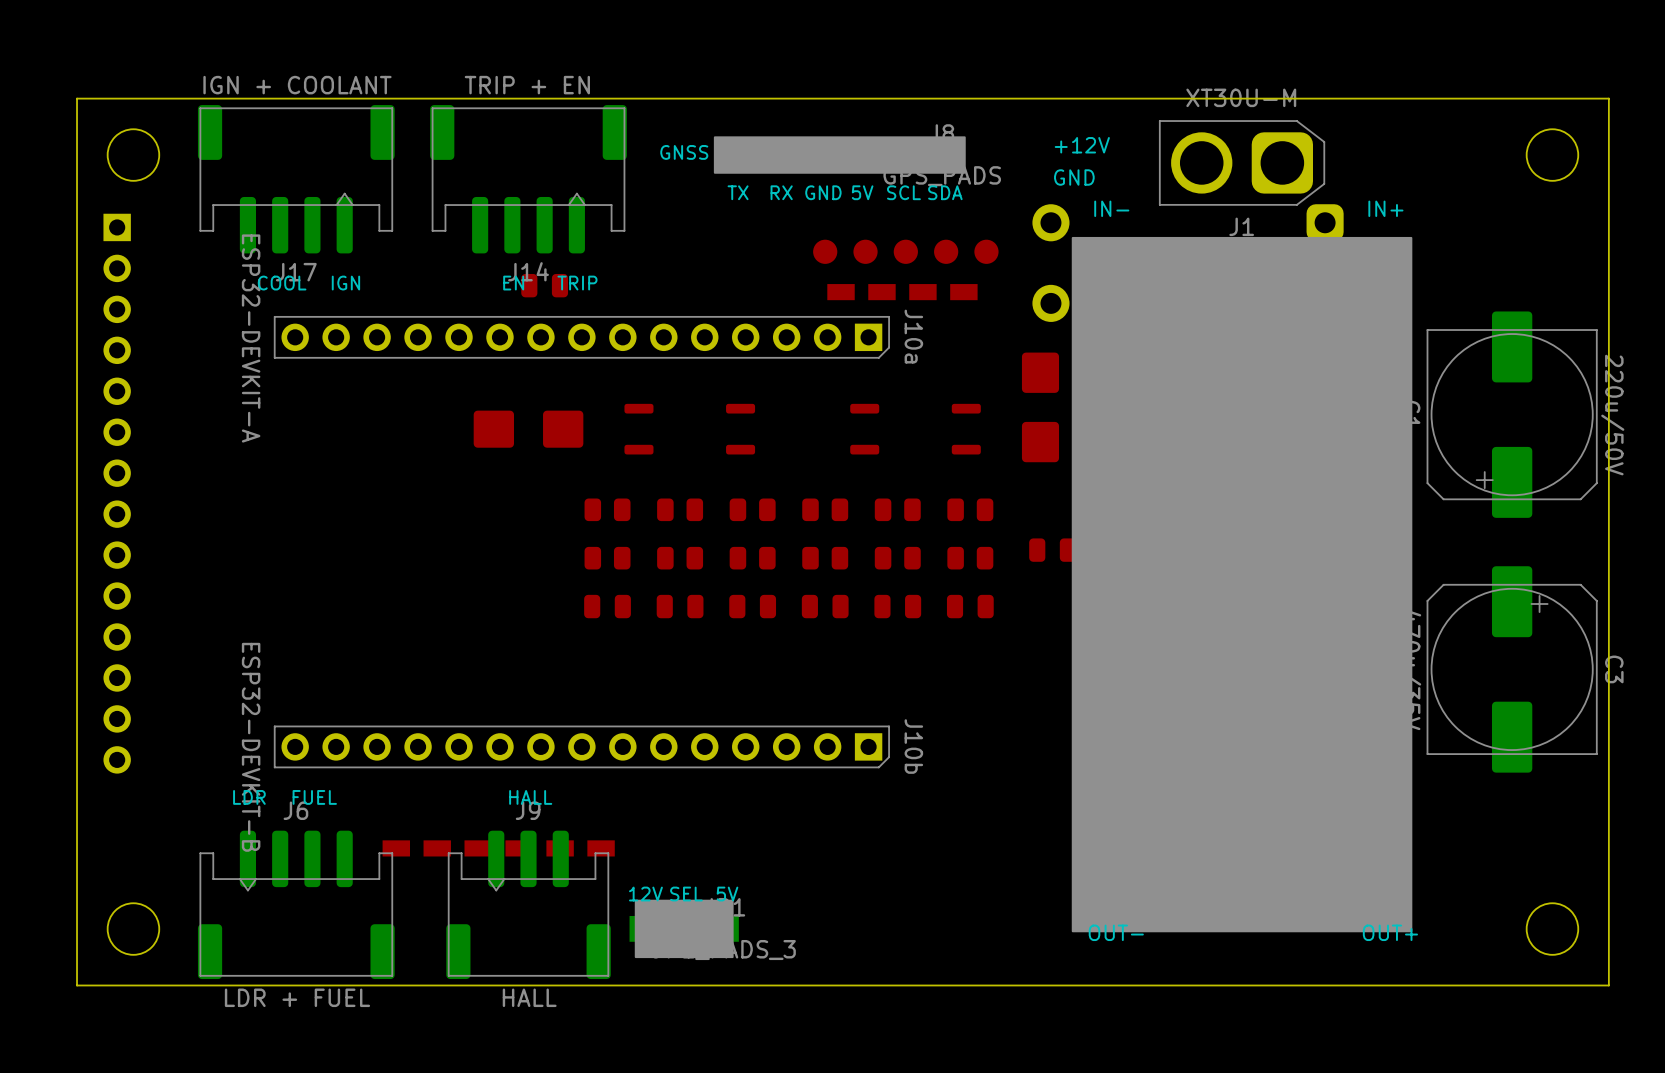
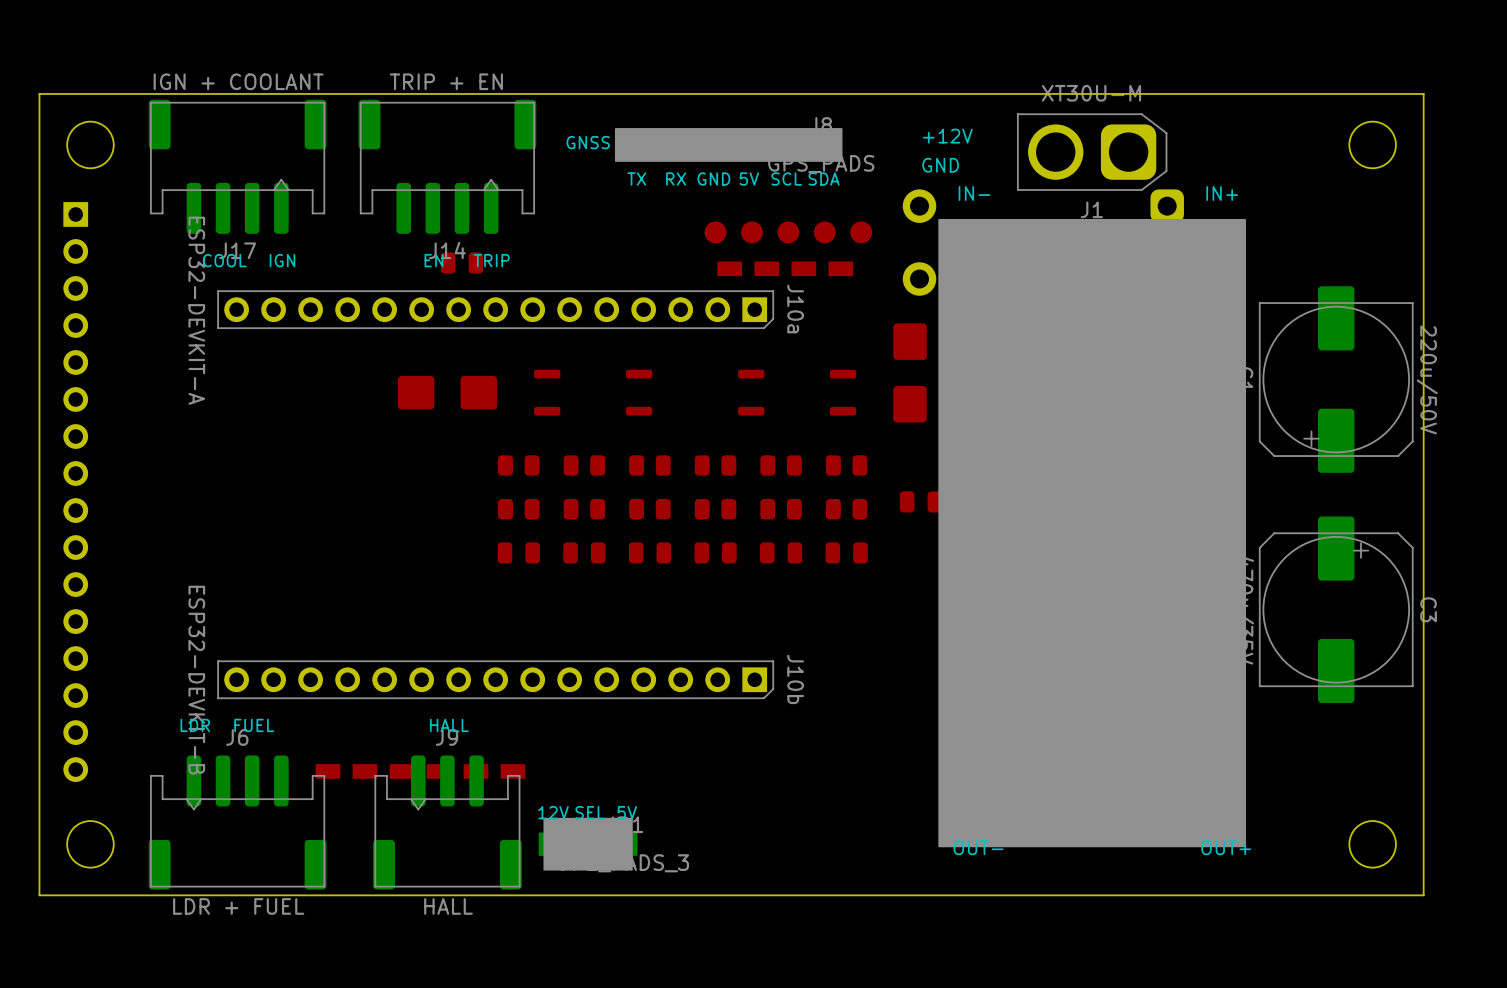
part: (117, 493) -> none
part: none -> (75, 492)

